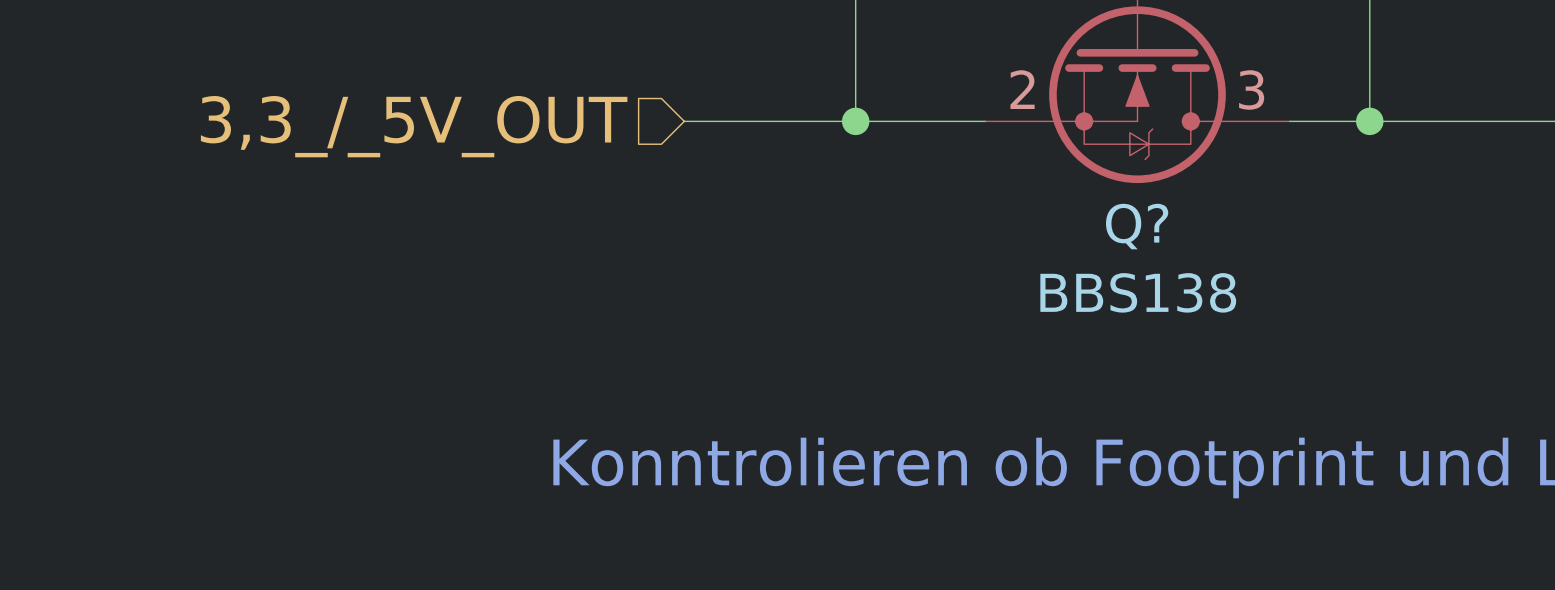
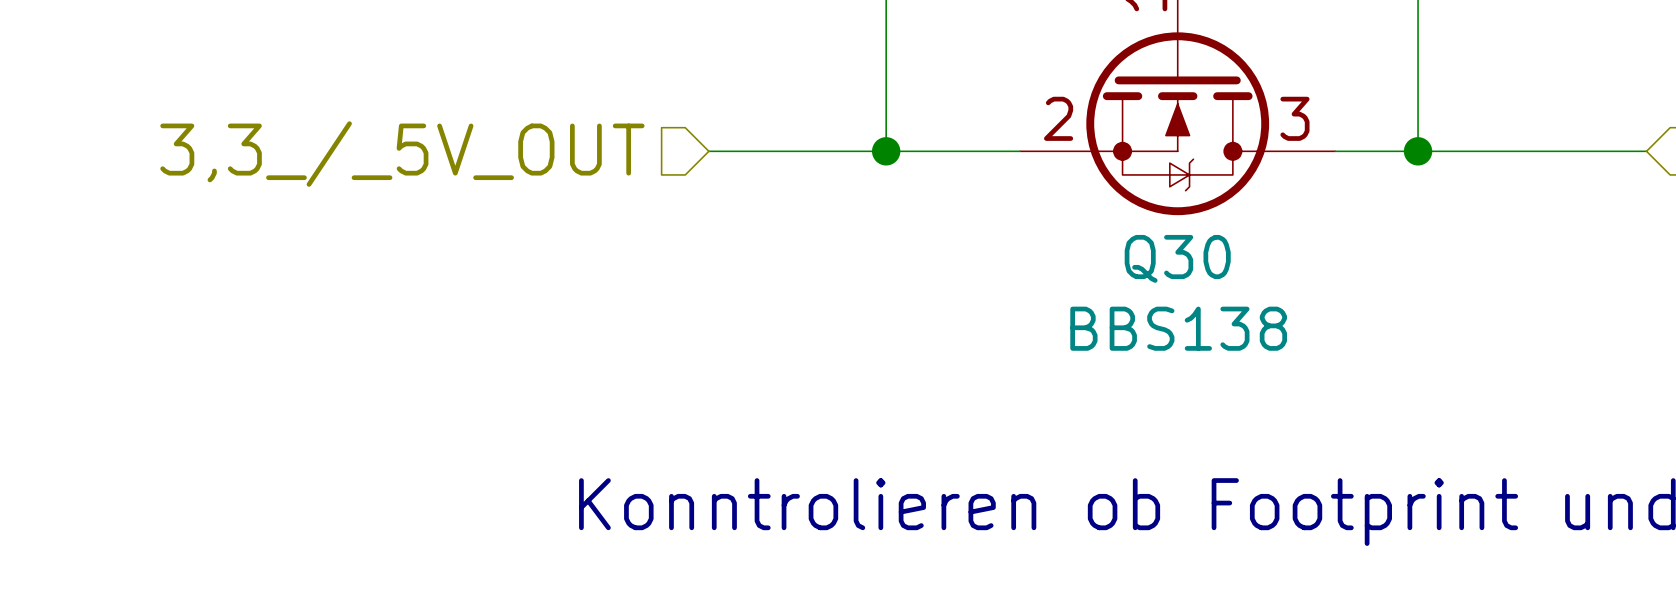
Q? name: Q? (1137, 226) -> Q30 (1177, 258)

